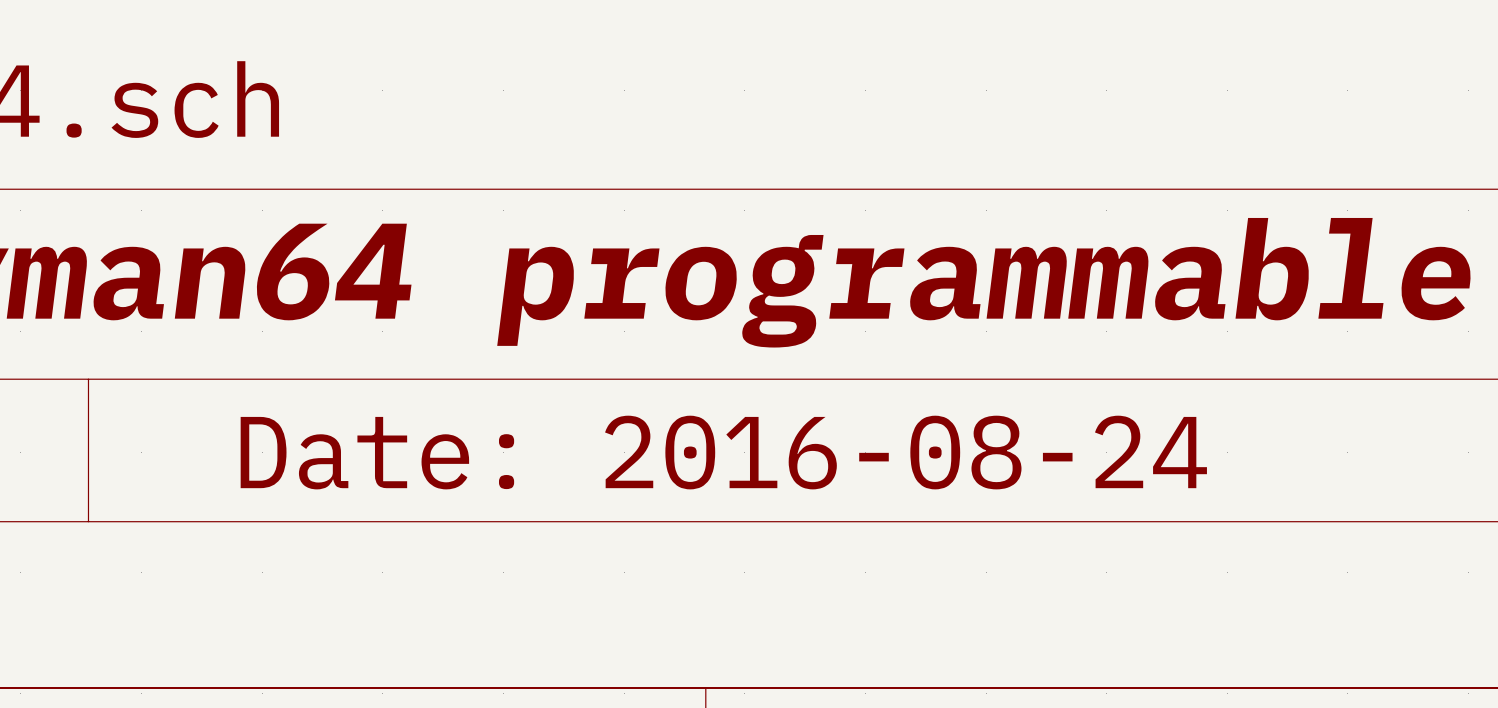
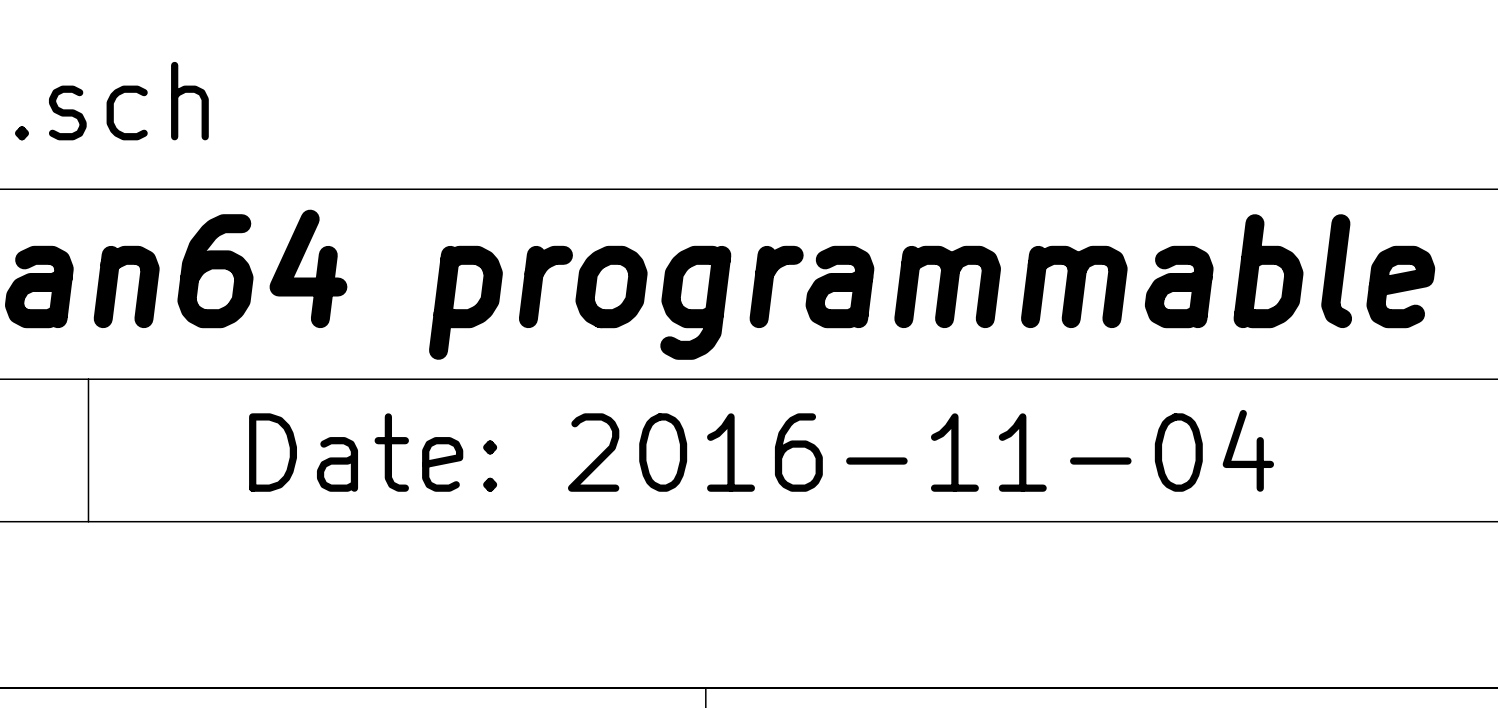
title block: Date: 2016-08-24 (723, 452) -> Date: 2016-11-04 (761, 450)

